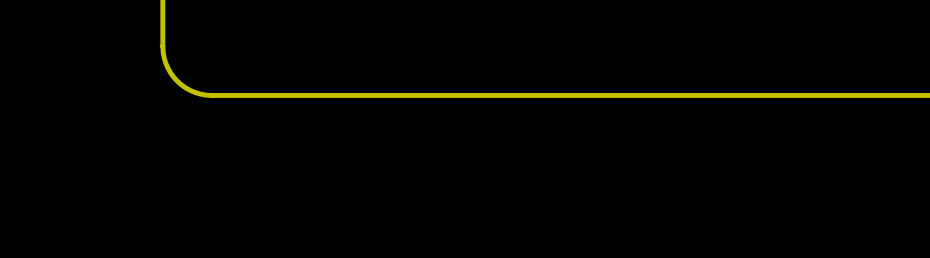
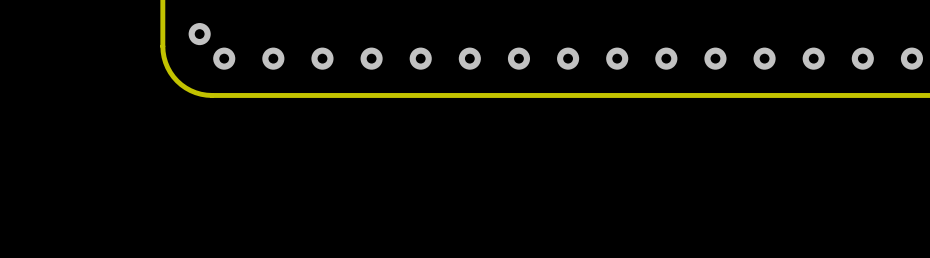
via: none -> (199, 34)
via: none -> (224, 58)
via: none -> (273, 58)
via: none -> (322, 58)
via: none -> (371, 58)
via: none -> (420, 58)
via: none -> (469, 58)
via: none -> (518, 58)
via: none -> (568, 58)
via: none -> (617, 58)
via: none -> (666, 58)
via: none -> (715, 58)
via: none -> (764, 58)
via: none -> (813, 58)
via: none -> (862, 58)
via: none -> (911, 58)

